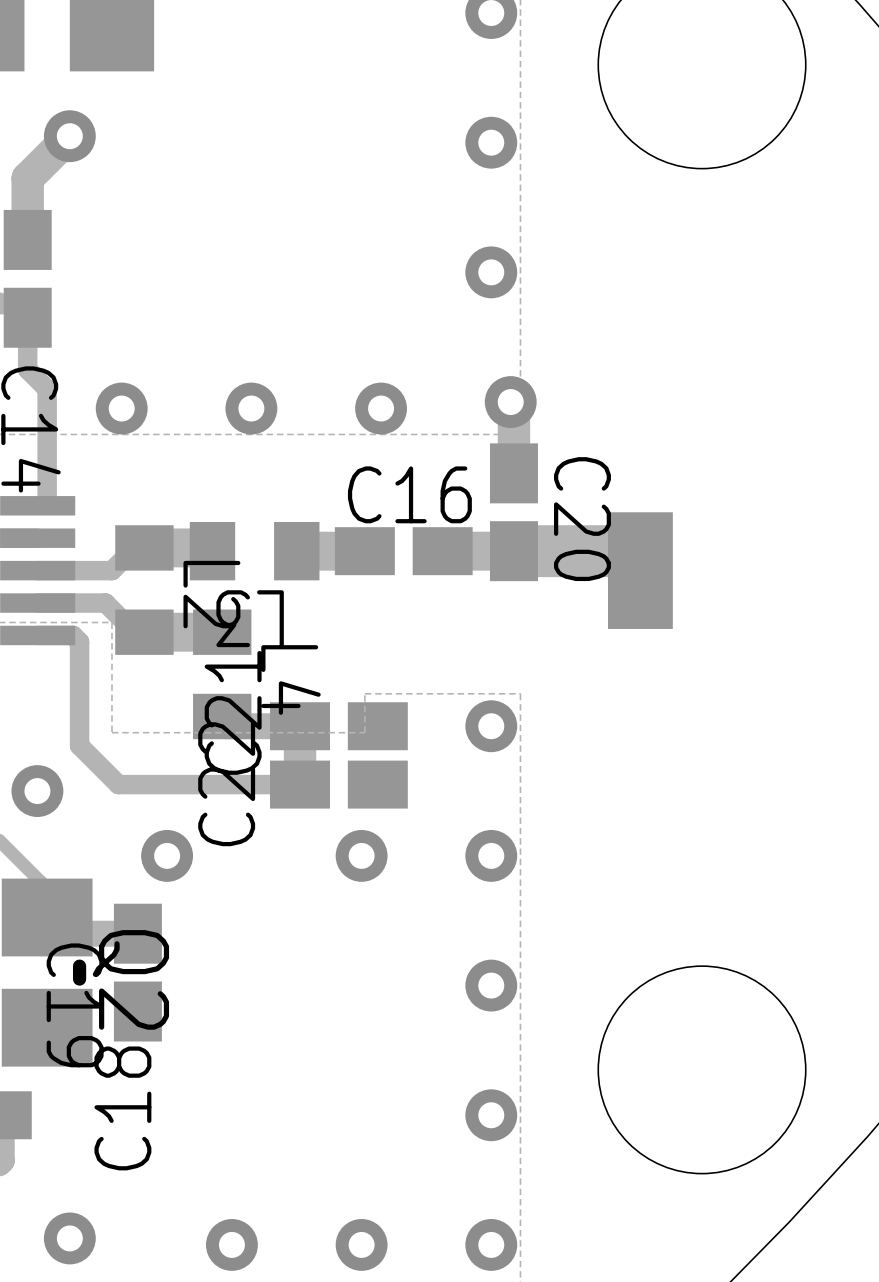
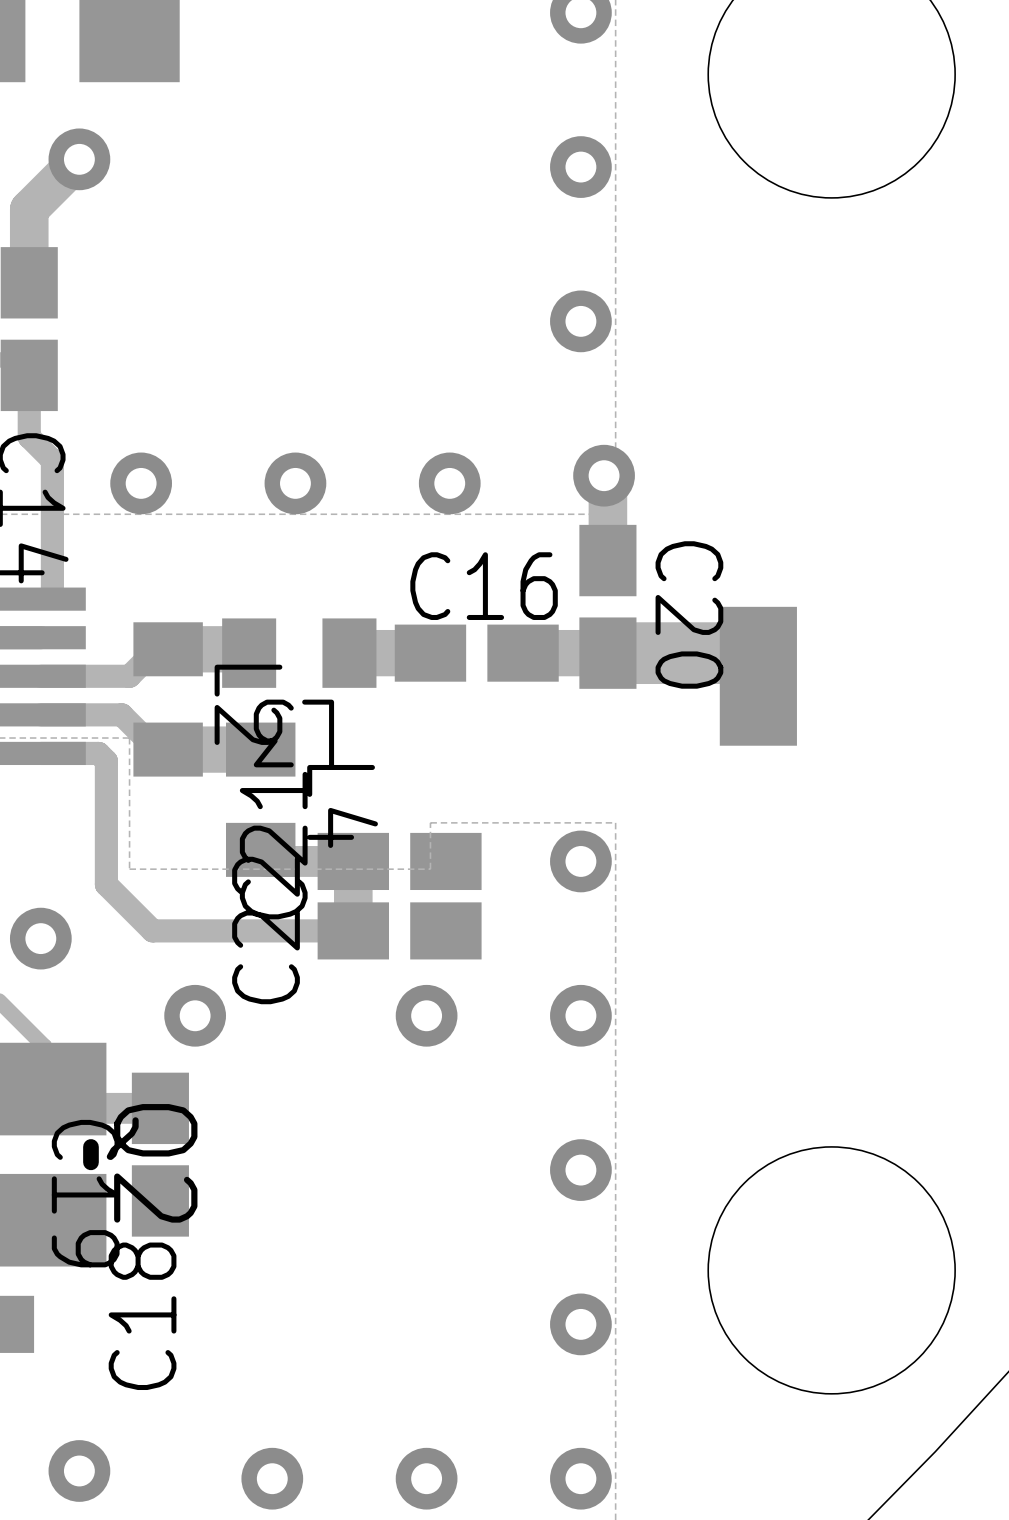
track: (73, 635) (79, 641) (79, 745) (118, 784) (131, 784) -> (83, 753) (98, 753) (106, 761) (106, 884) (152, 930)

